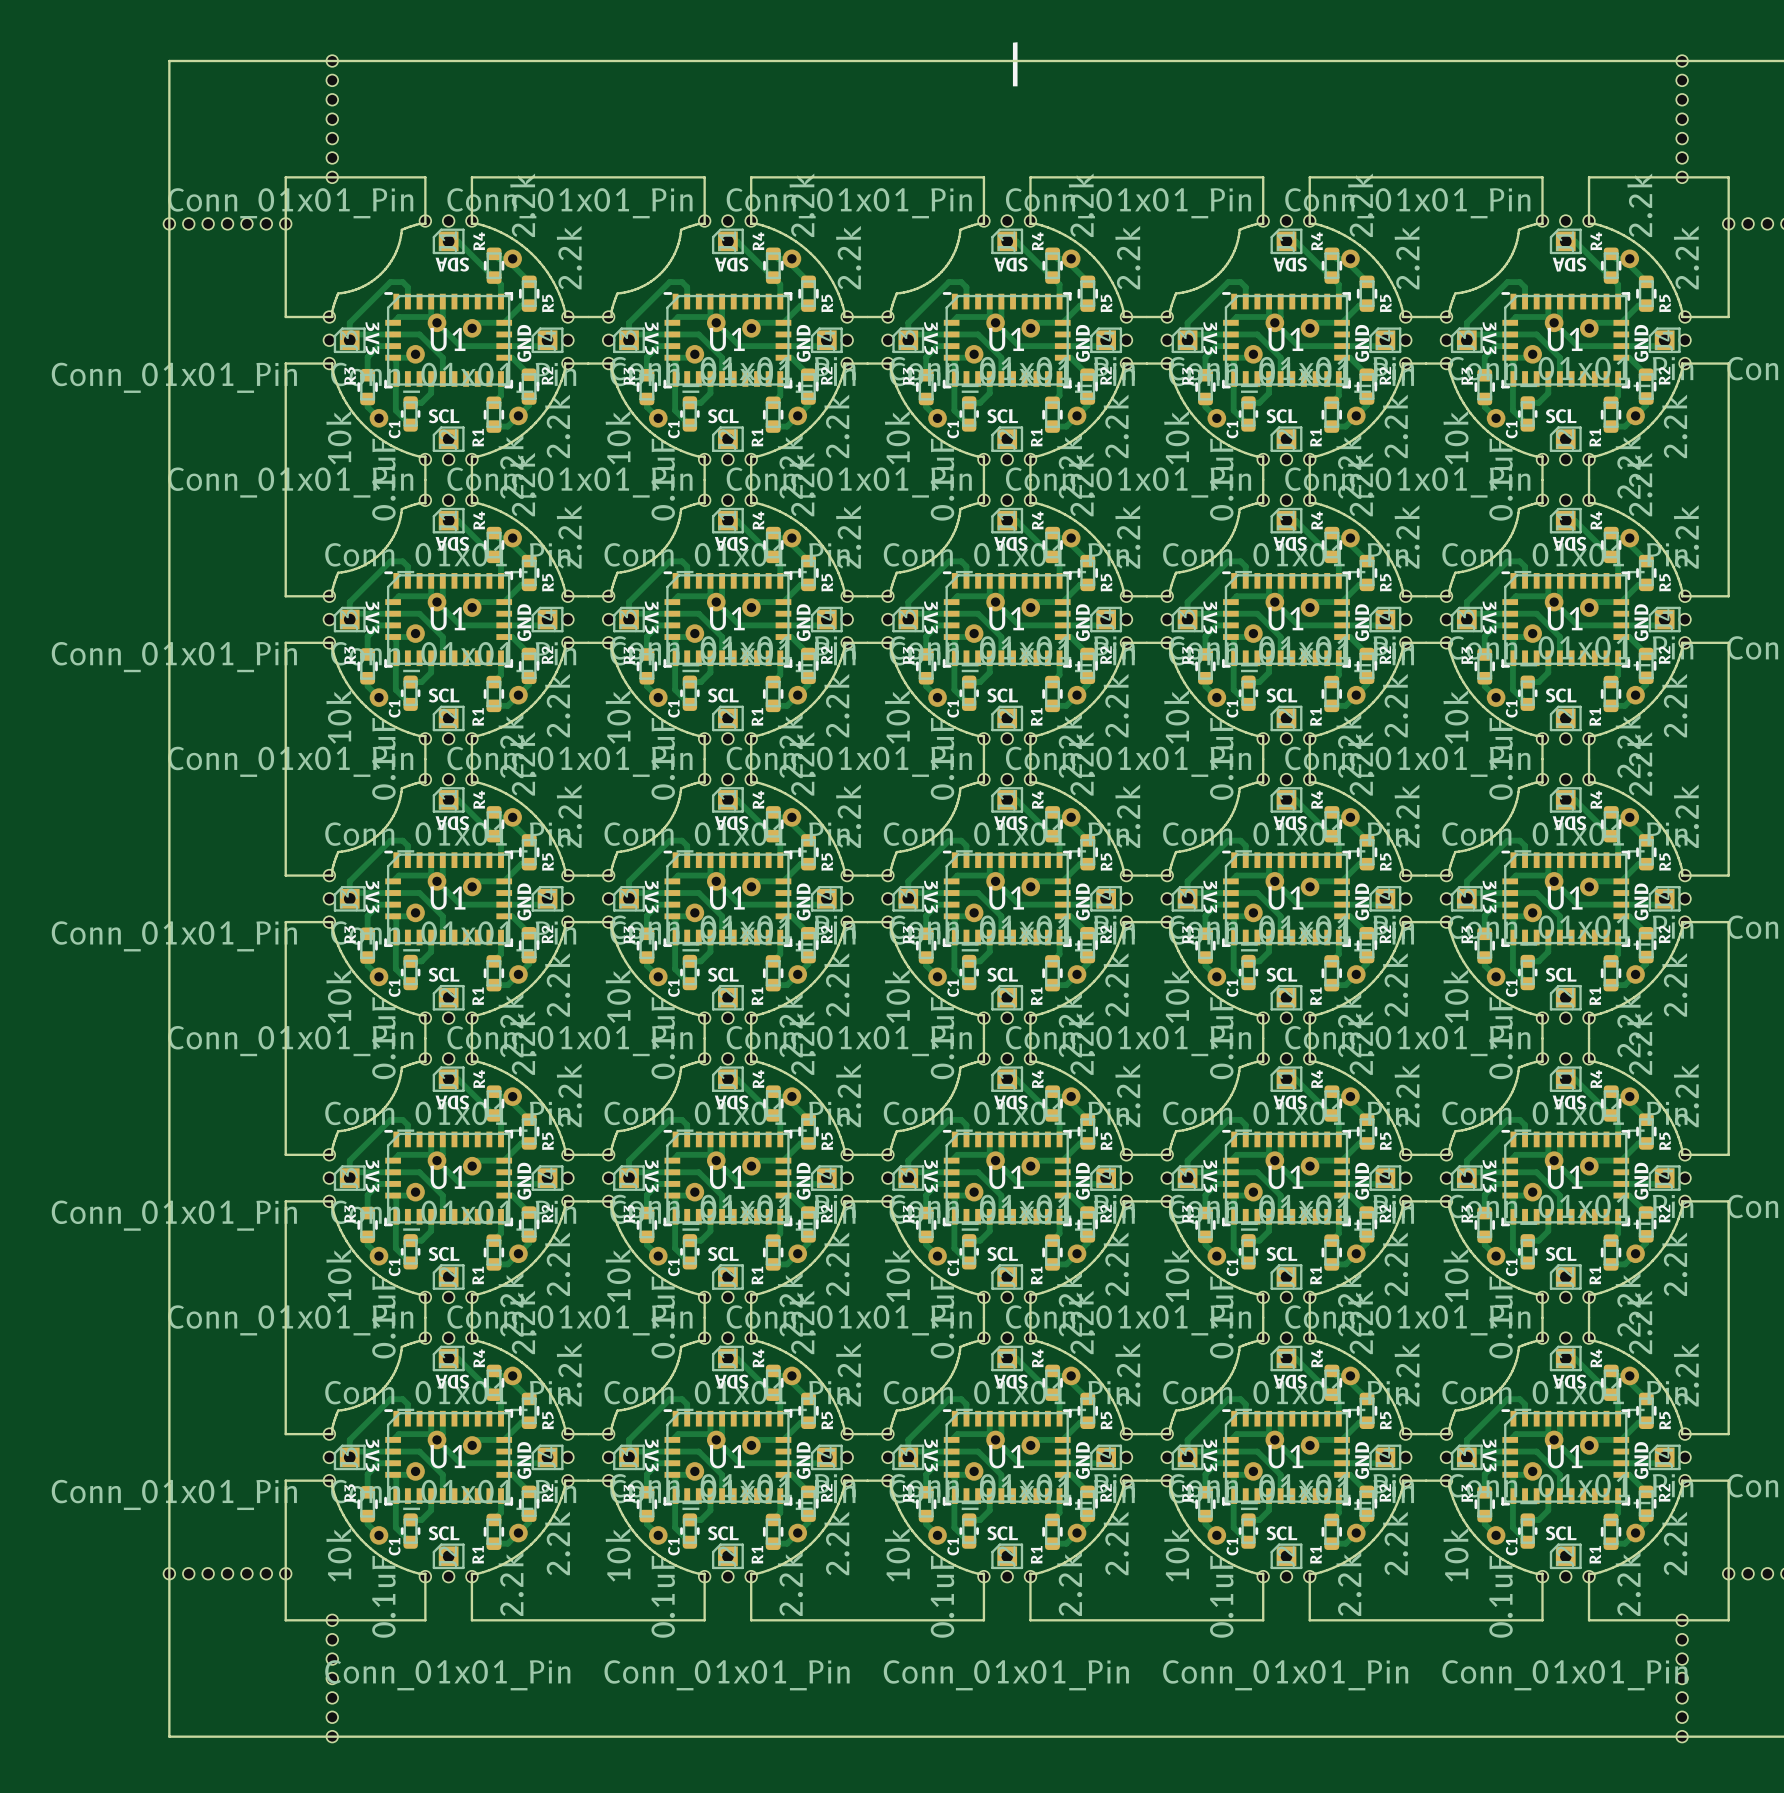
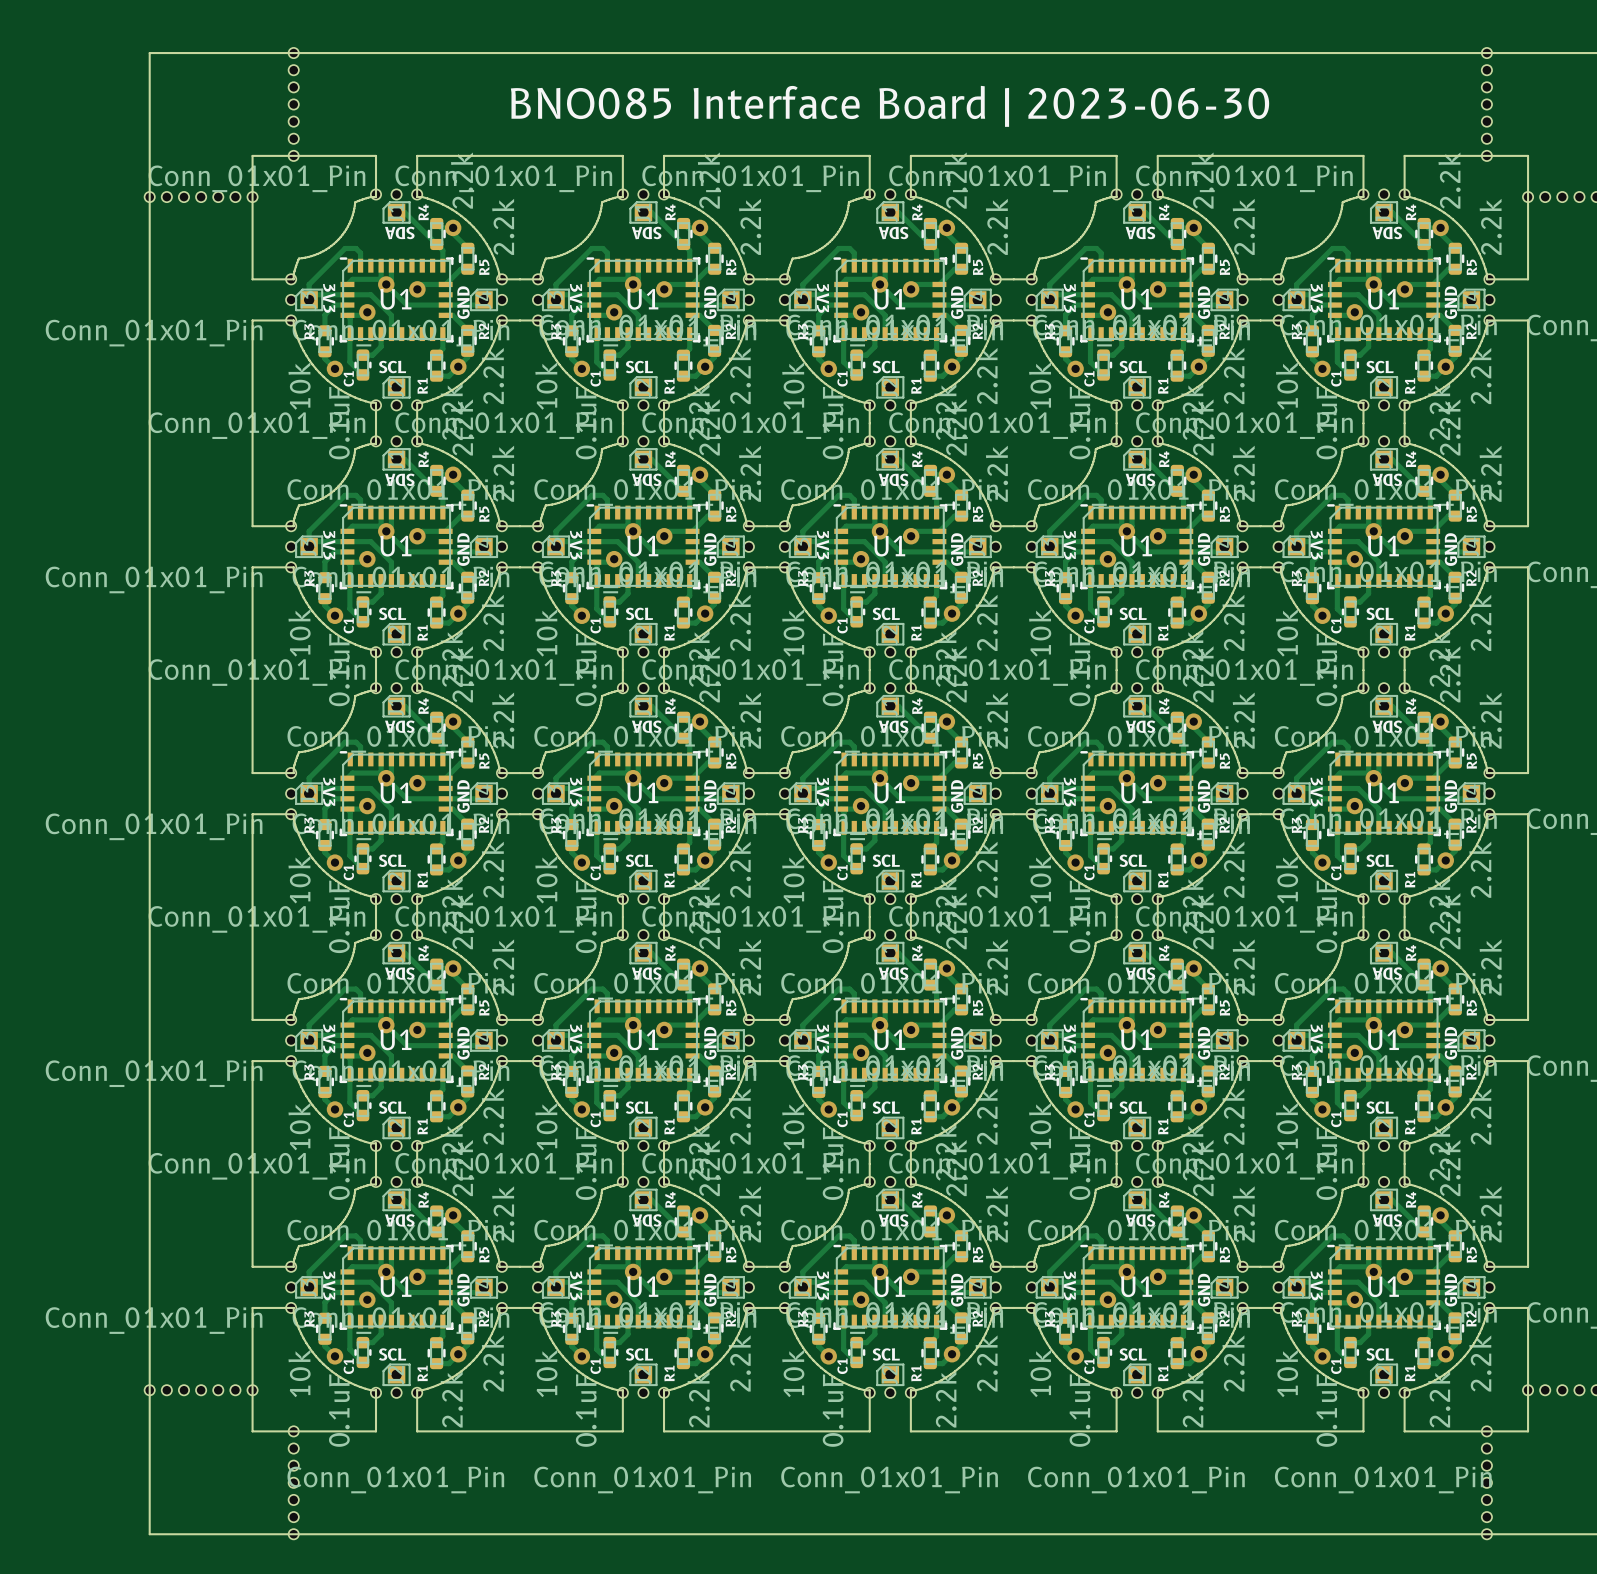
text: | (1015, 64) -> none
text: none -> BNO085 Interface Board | 2023-06-30 (890, 106)

